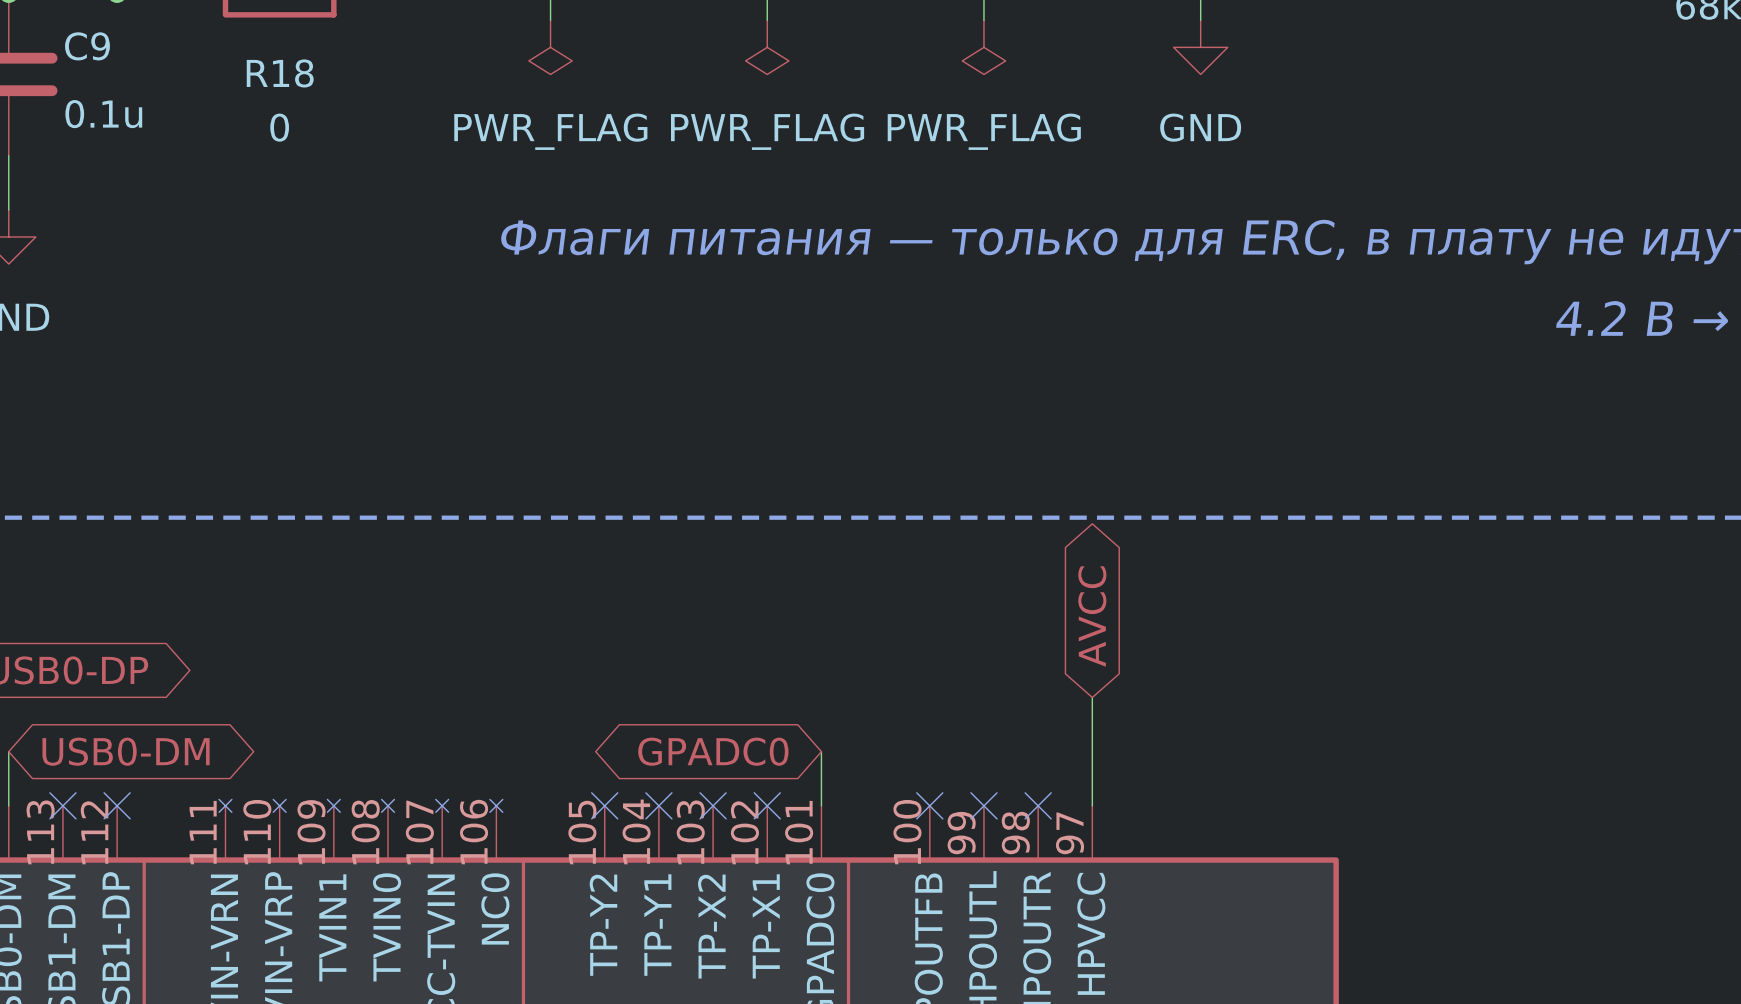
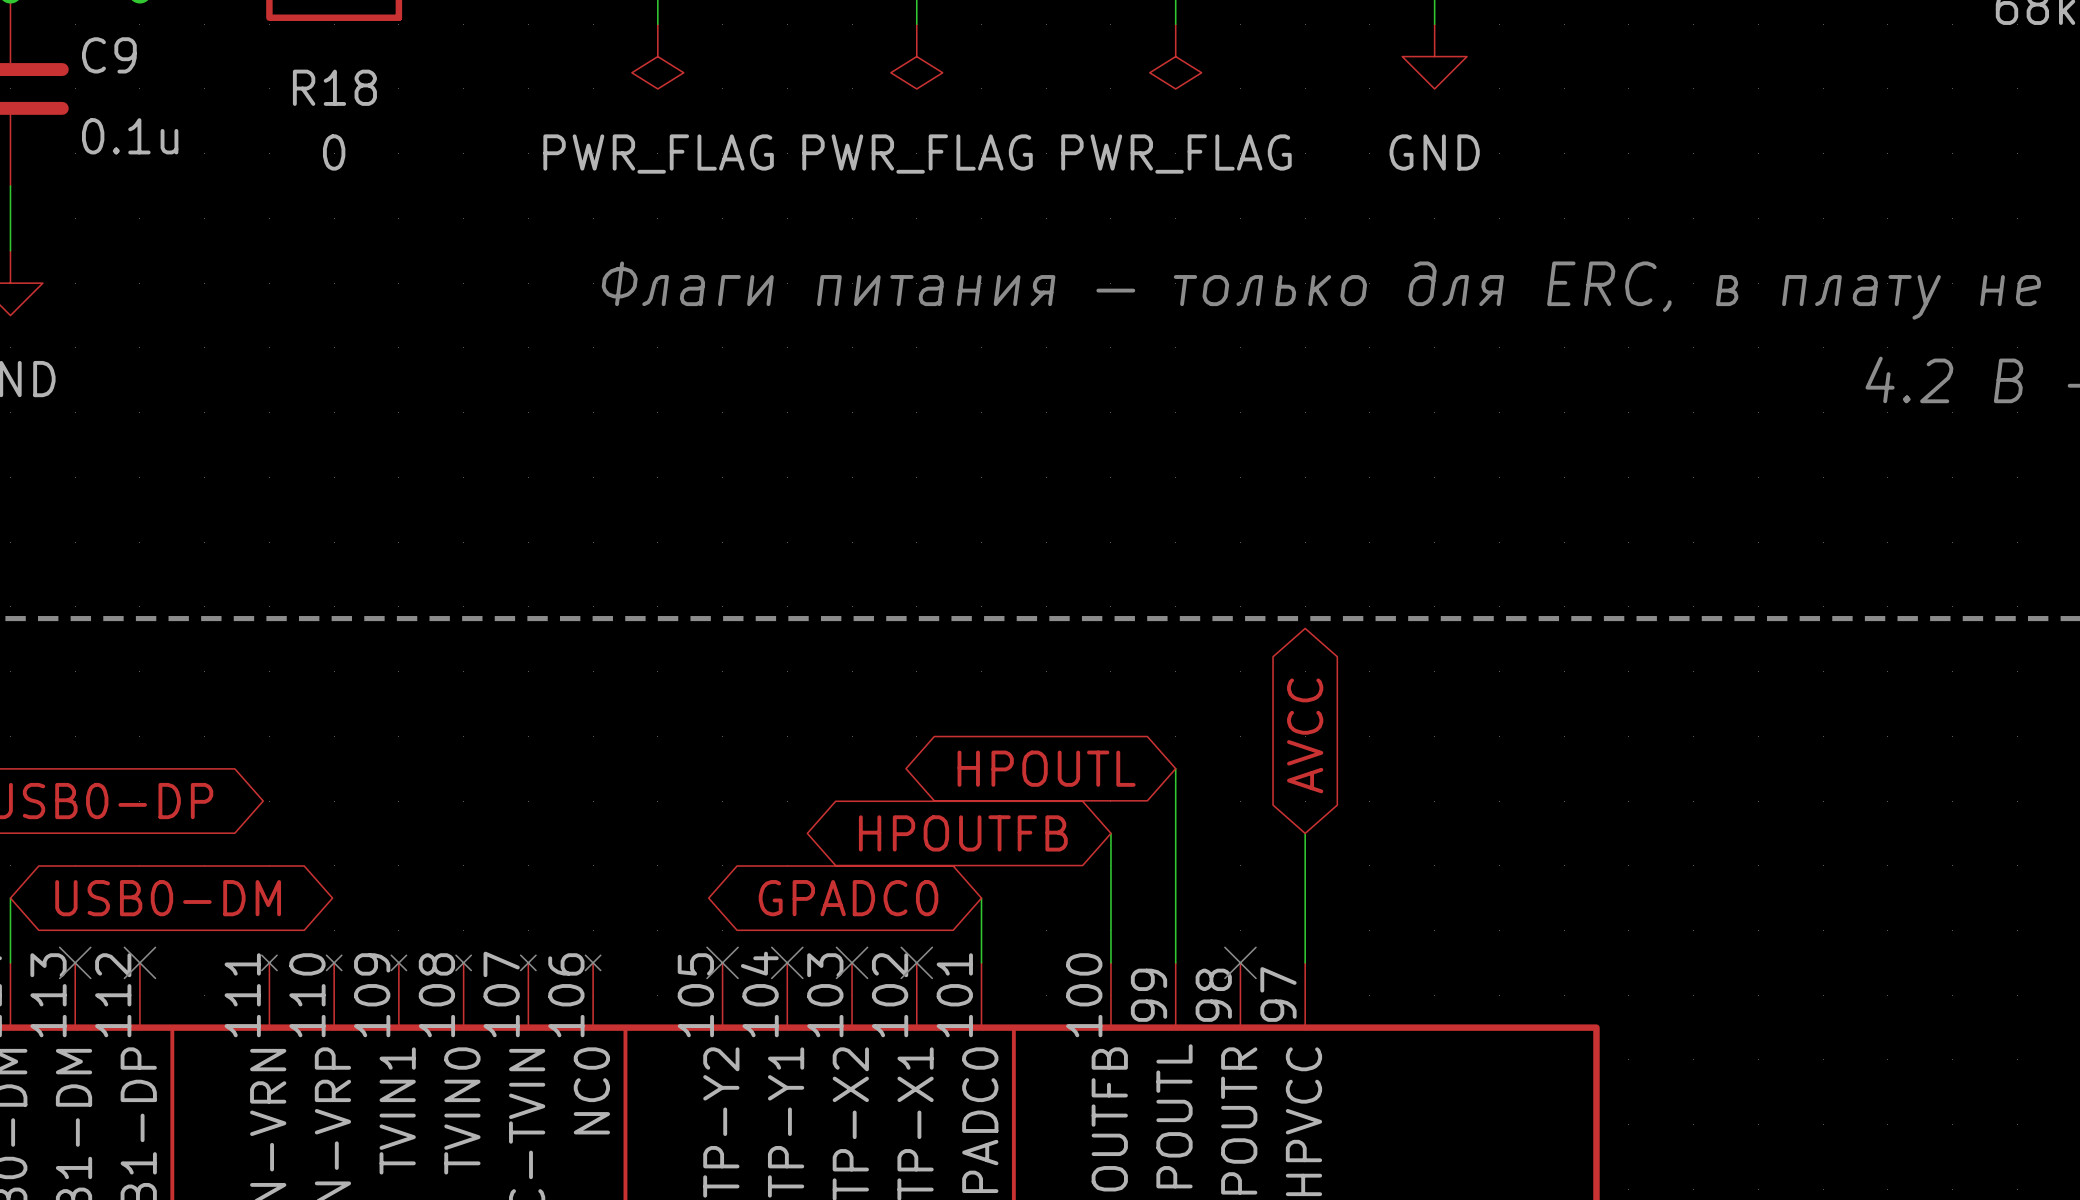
global label: none -> HPOUTL (1046, 768)
wire: none -> (1175, 768) (1175, 962)
global label: none -> HPOUTFB (963, 833)
wire: none -> (1110, 833) (1110, 962)
no-connect mark: (929, 805) -> none
no-connect mark: (983, 805) -> none

